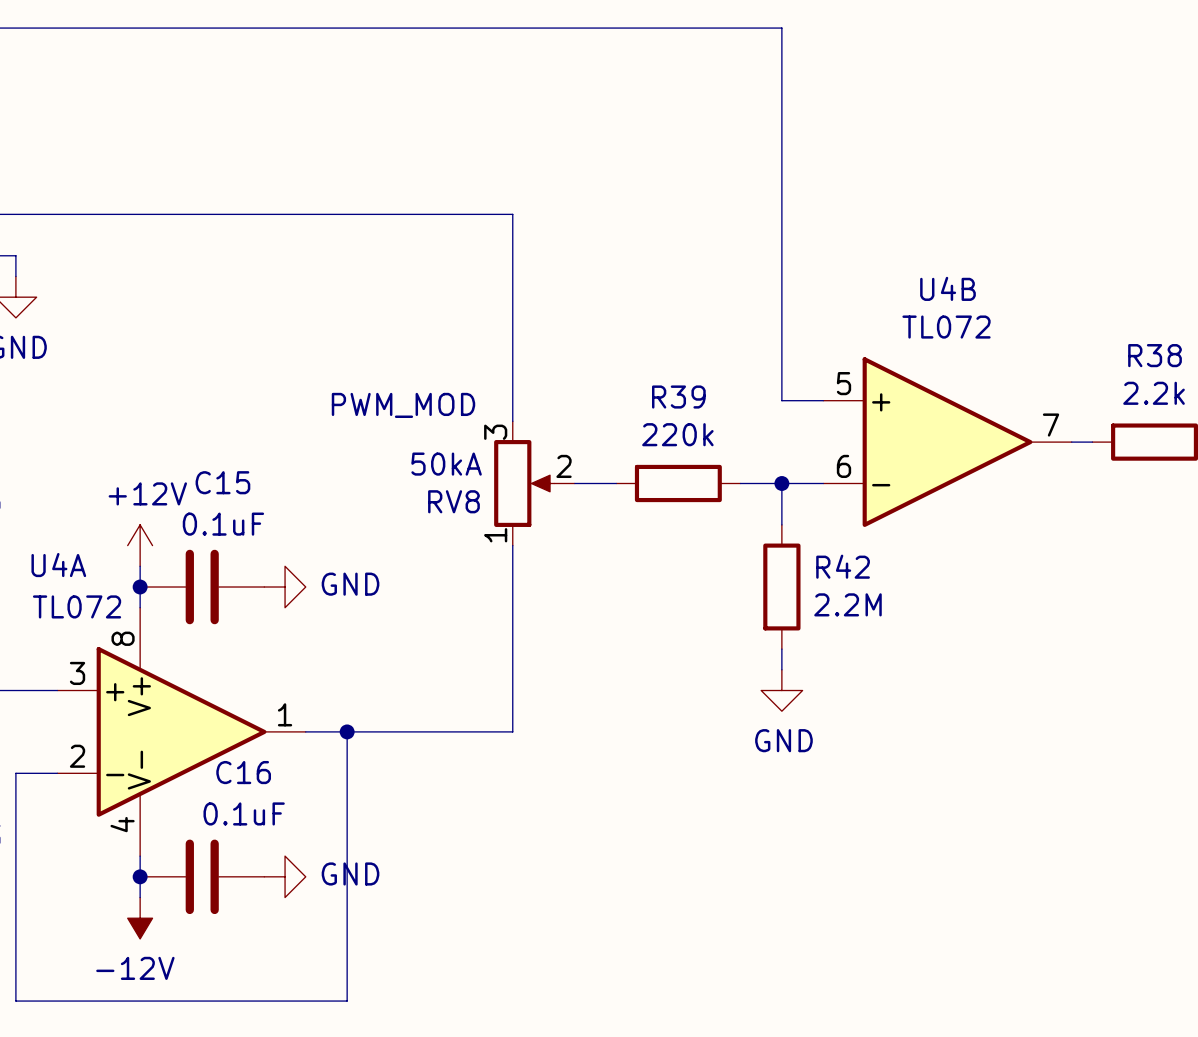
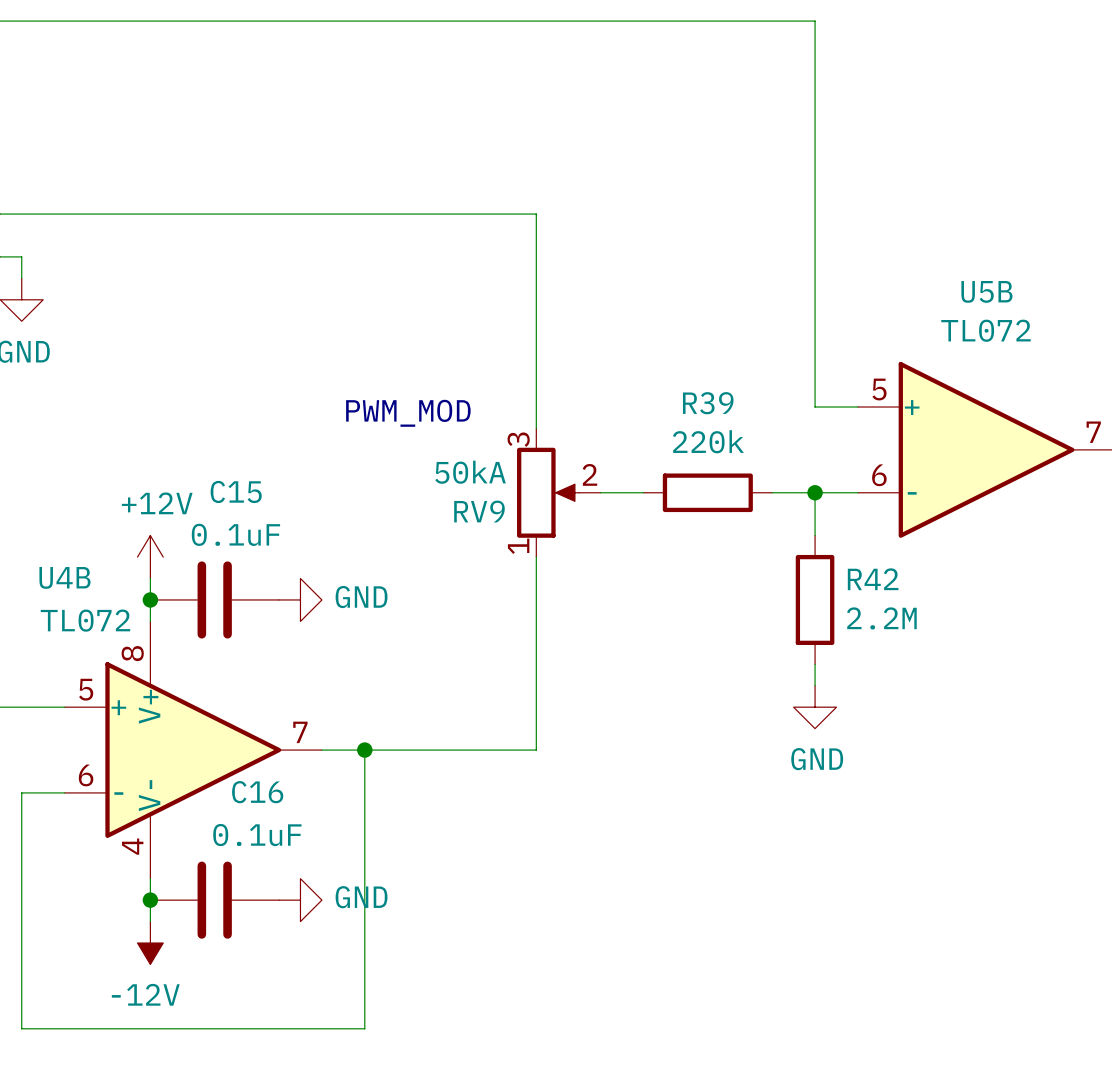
U4B name: U4B (947, 288) -> U5B (986, 291)
RV8 name: RV8 (453, 501) -> RV9 (479, 511)
U4A name: U4A (58, 565) -> U4B (64, 577)
U4A pin number: 3 (77, 673) -> 5 (86, 689)
U4A pin number: 1 (285, 714) -> 7 (300, 732)
U4A pin number: 2 (77, 756) -> 6 (86, 775)

